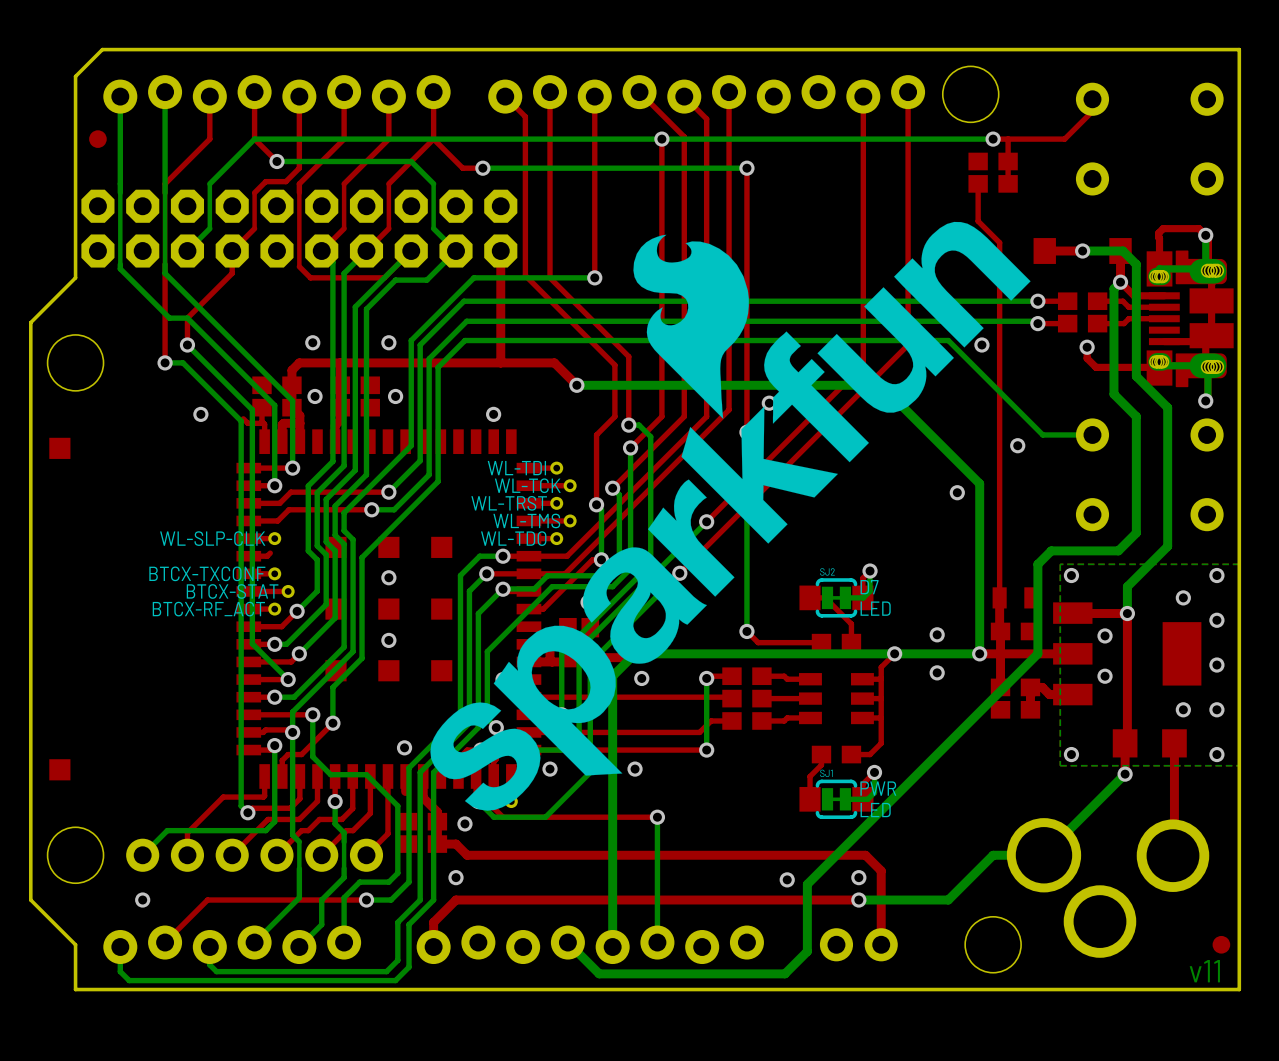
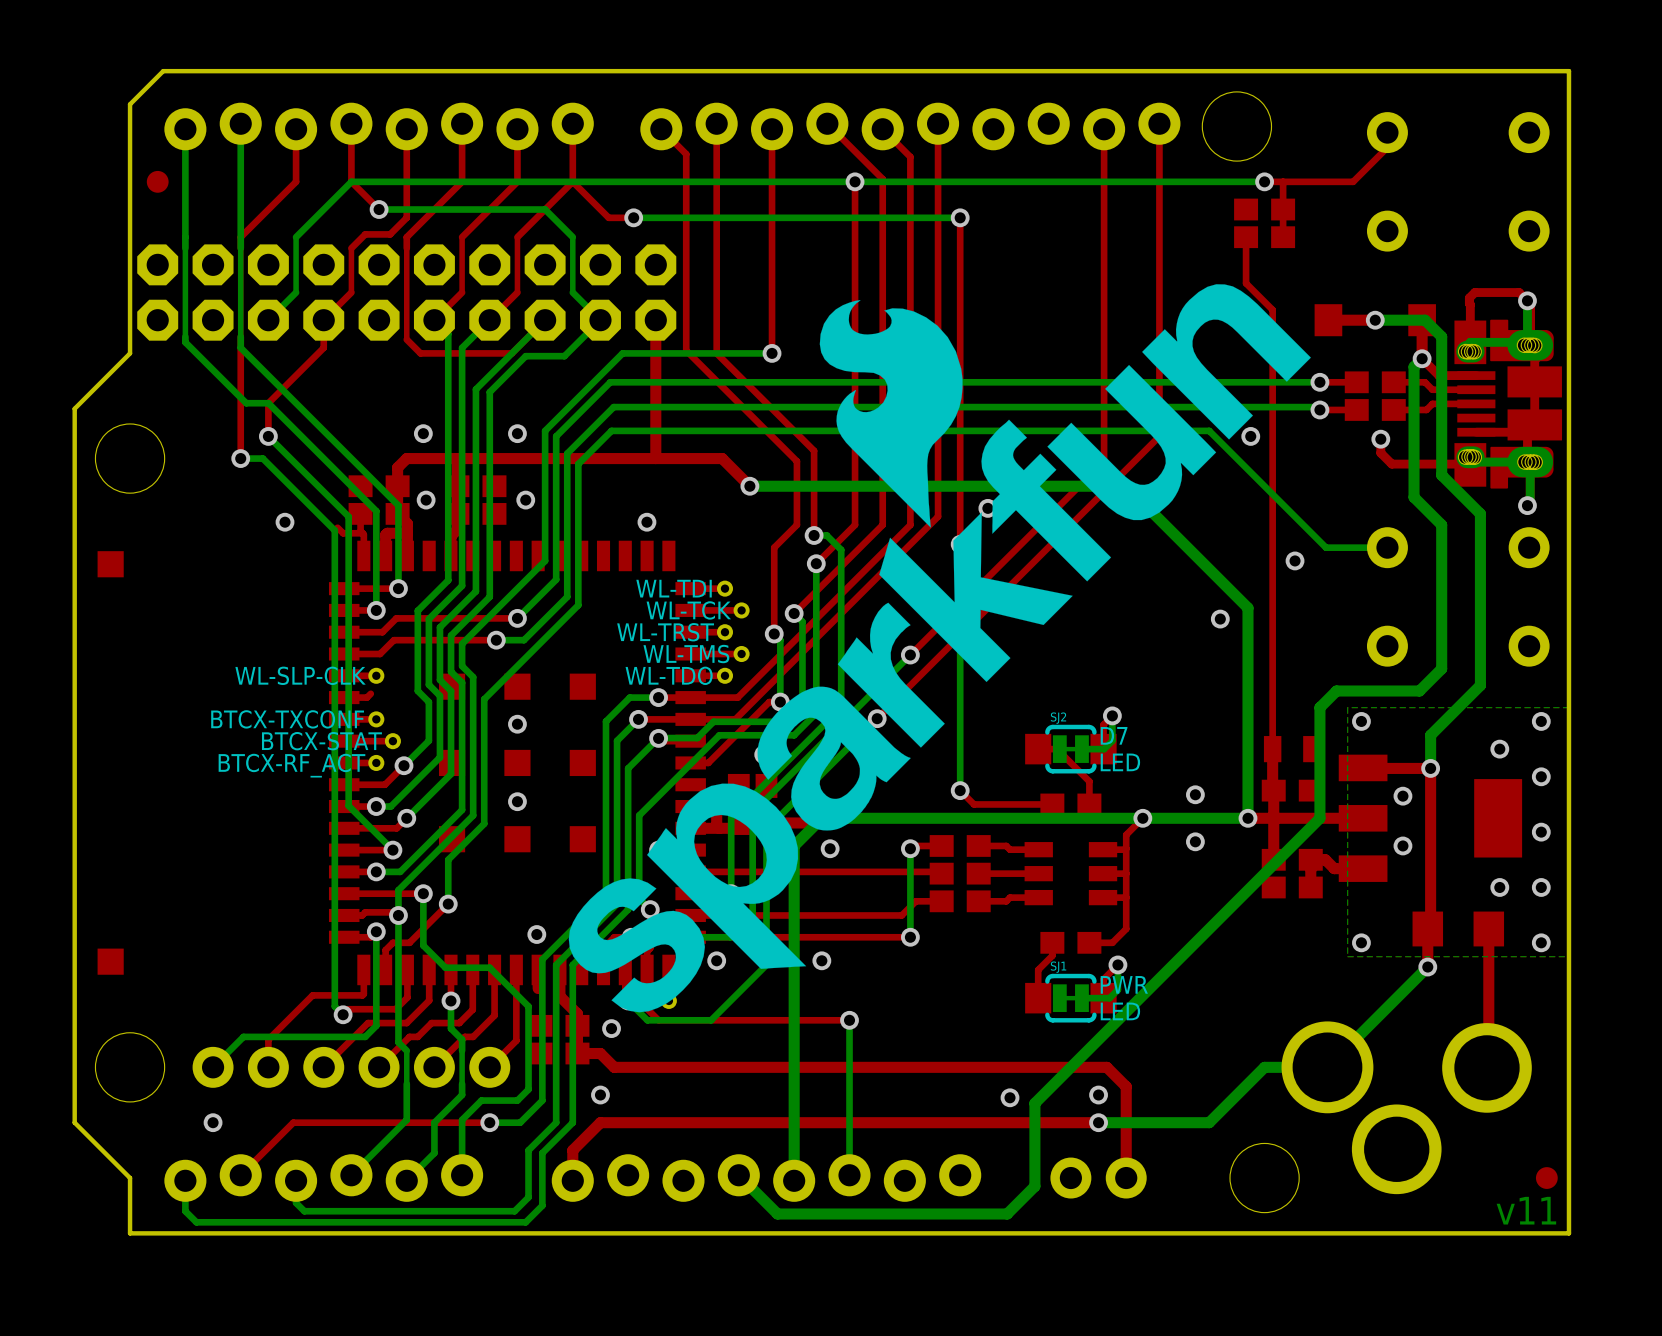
part footprint: [1146, 250, 1234, 388] -> [1454, 319, 1563, 489]

